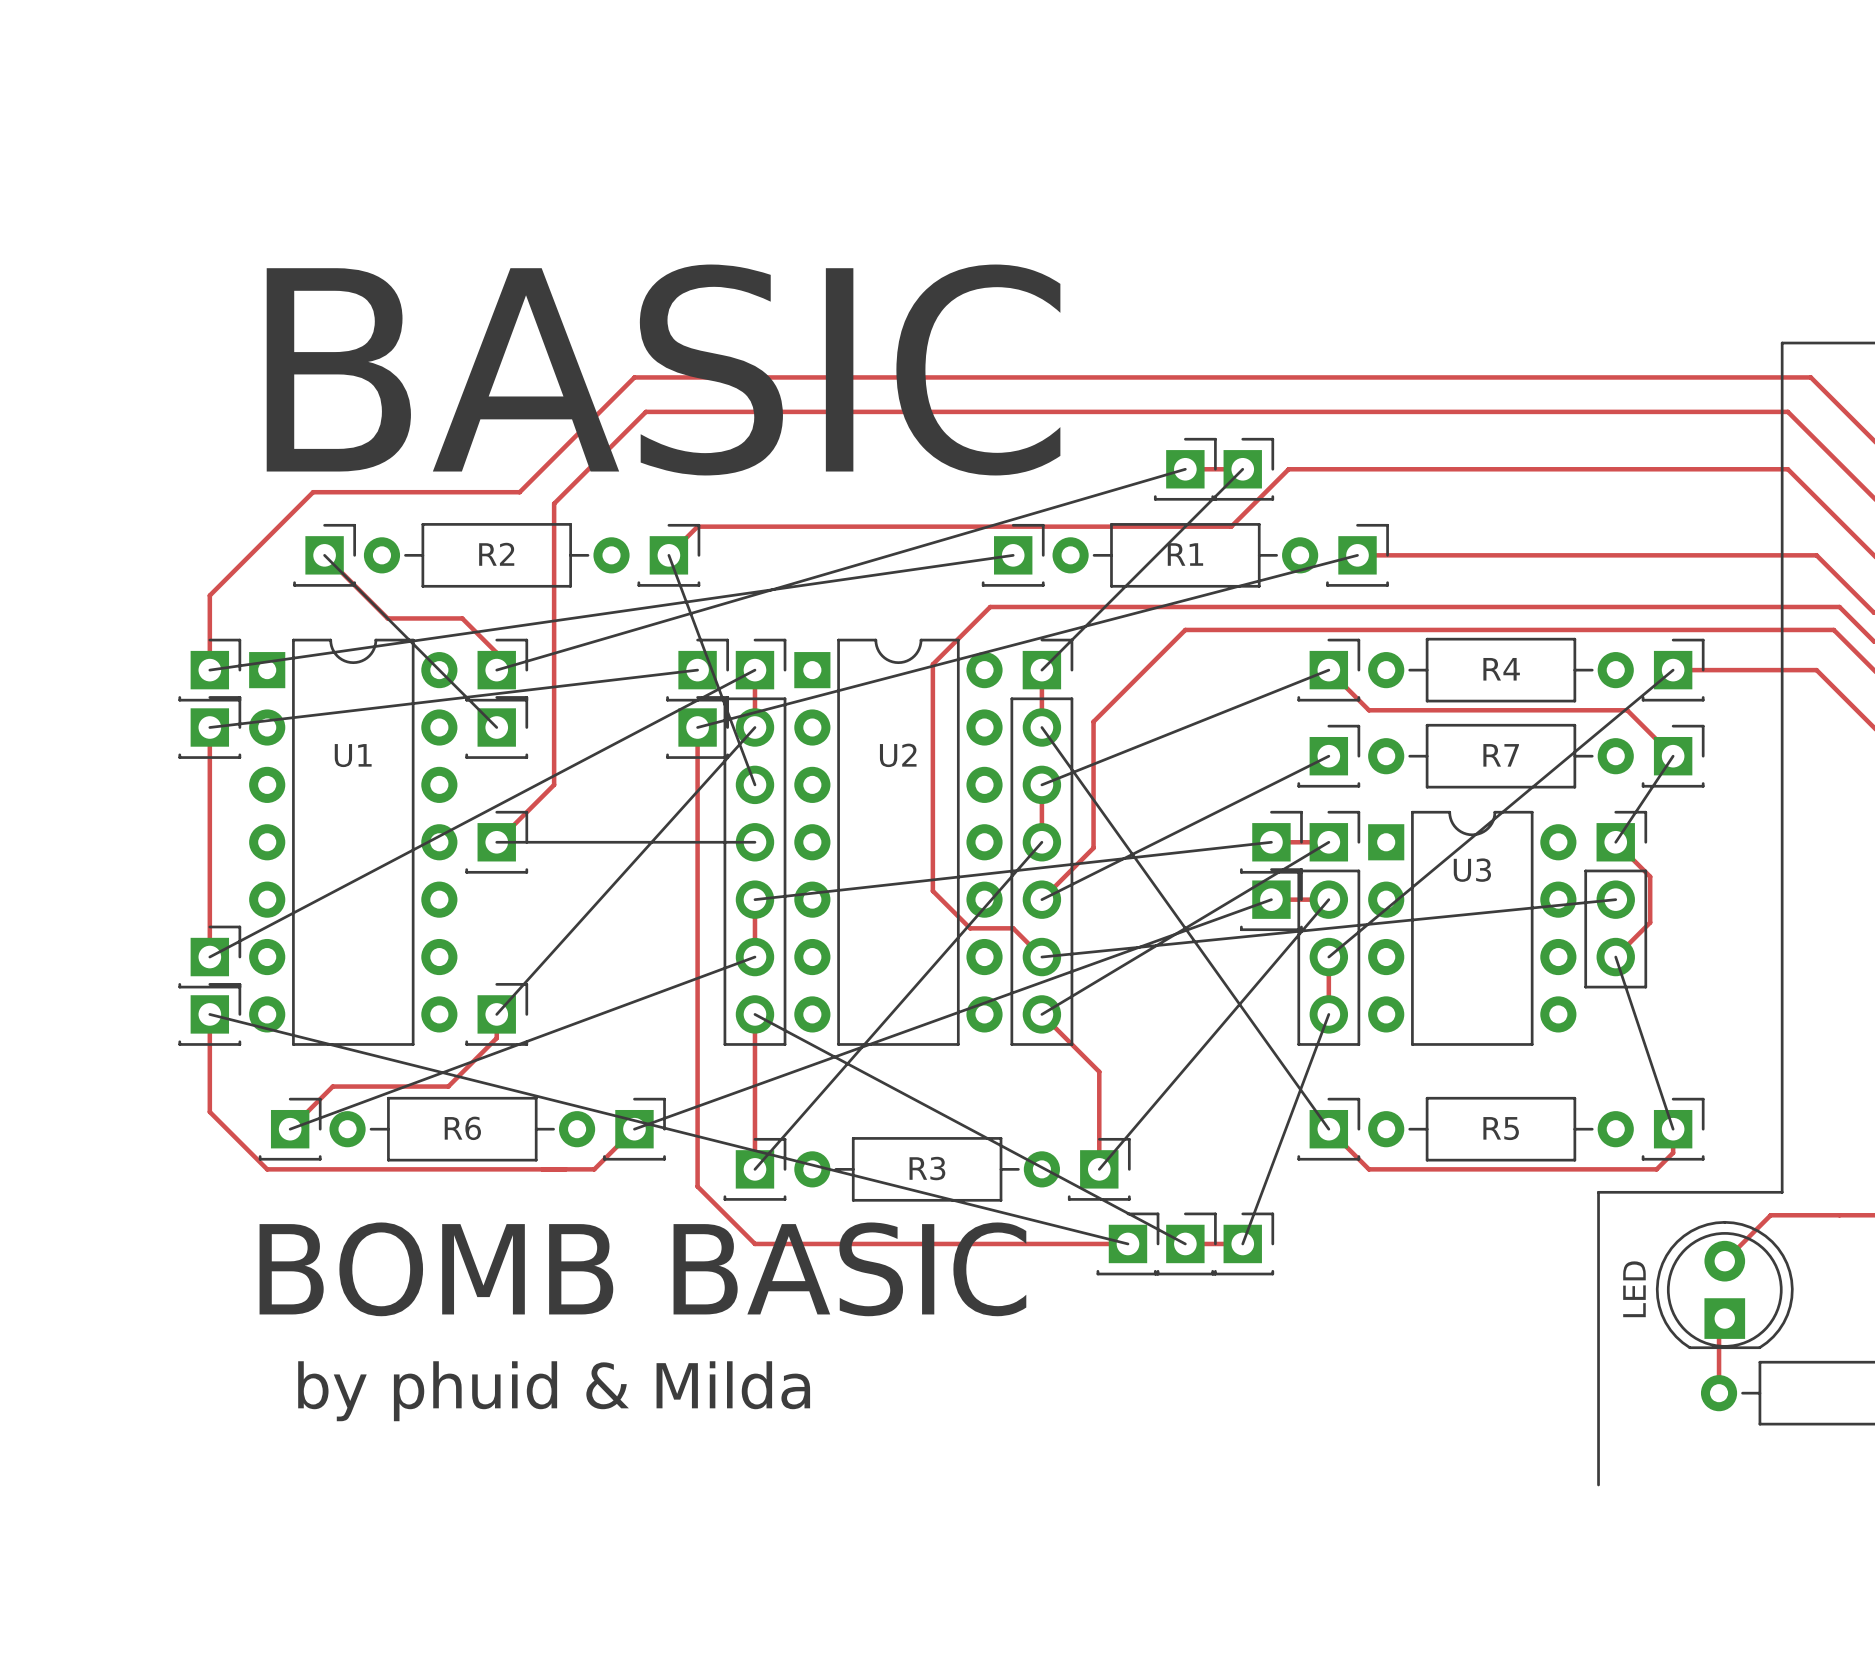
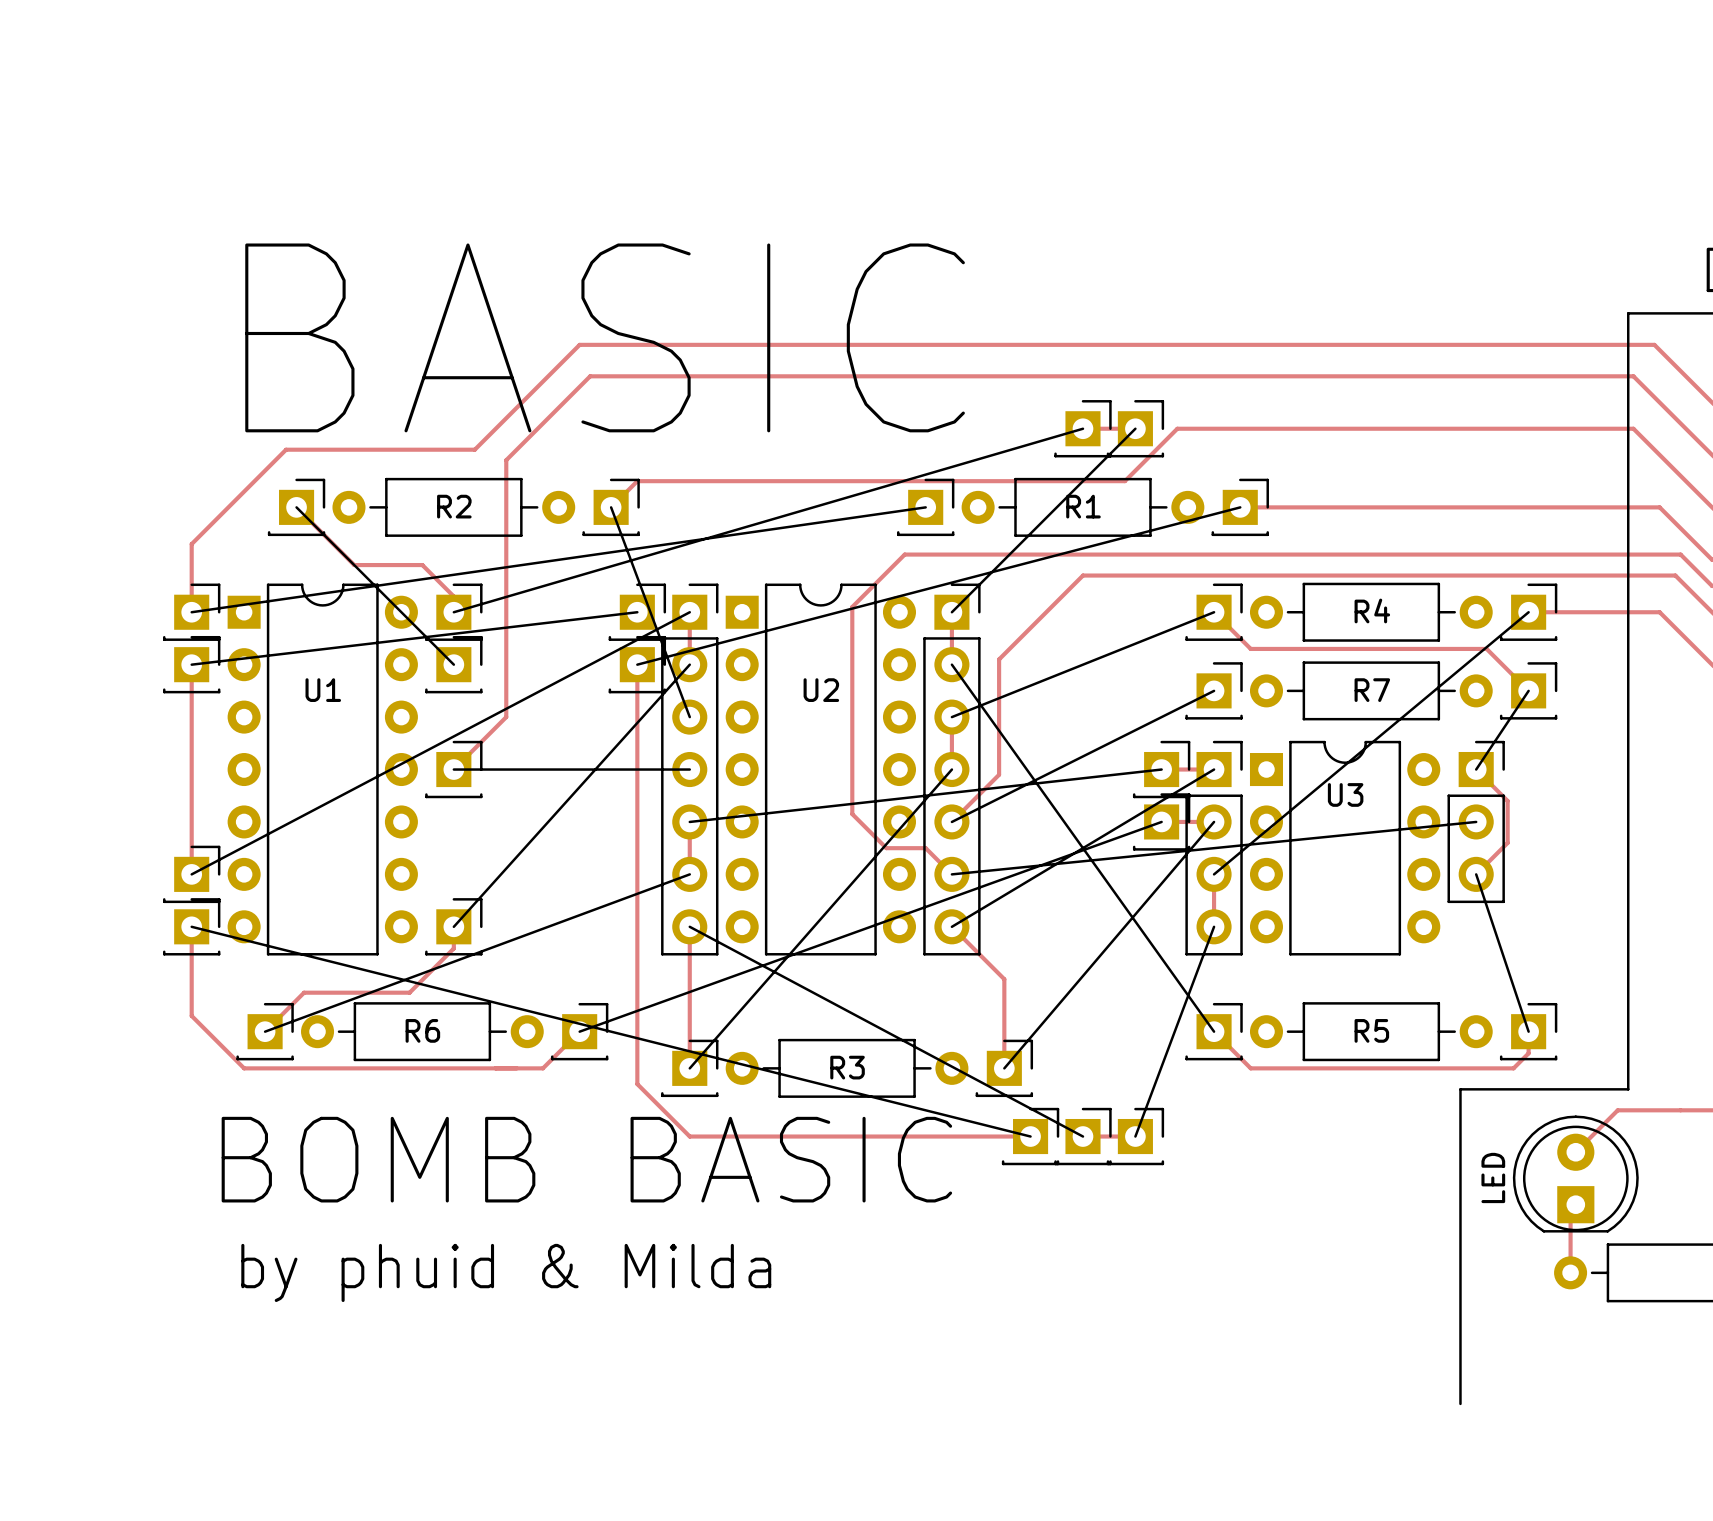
line: none -> (1460, 1356) (1460, 1403)

